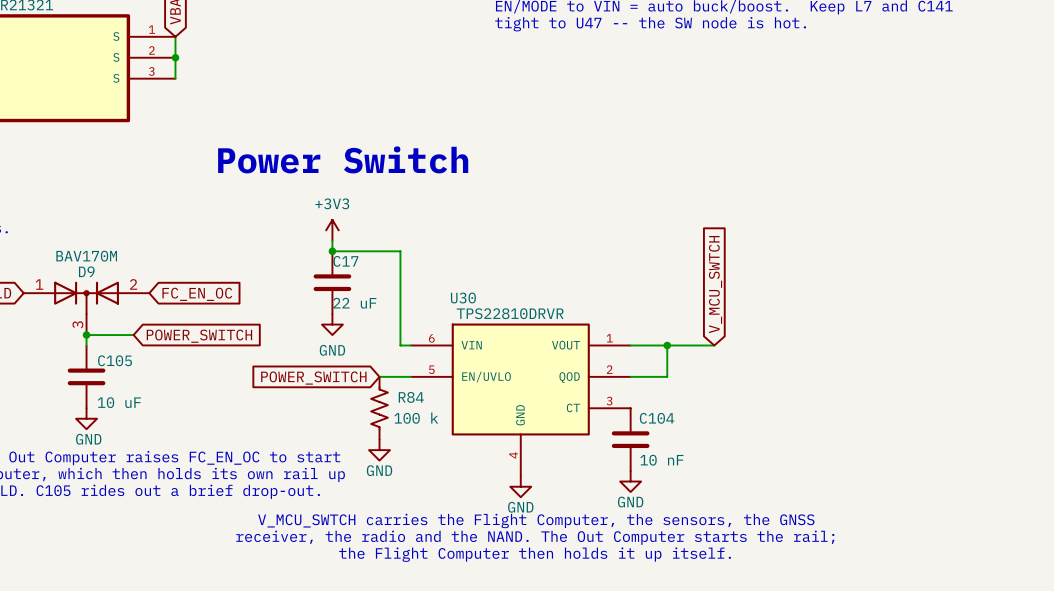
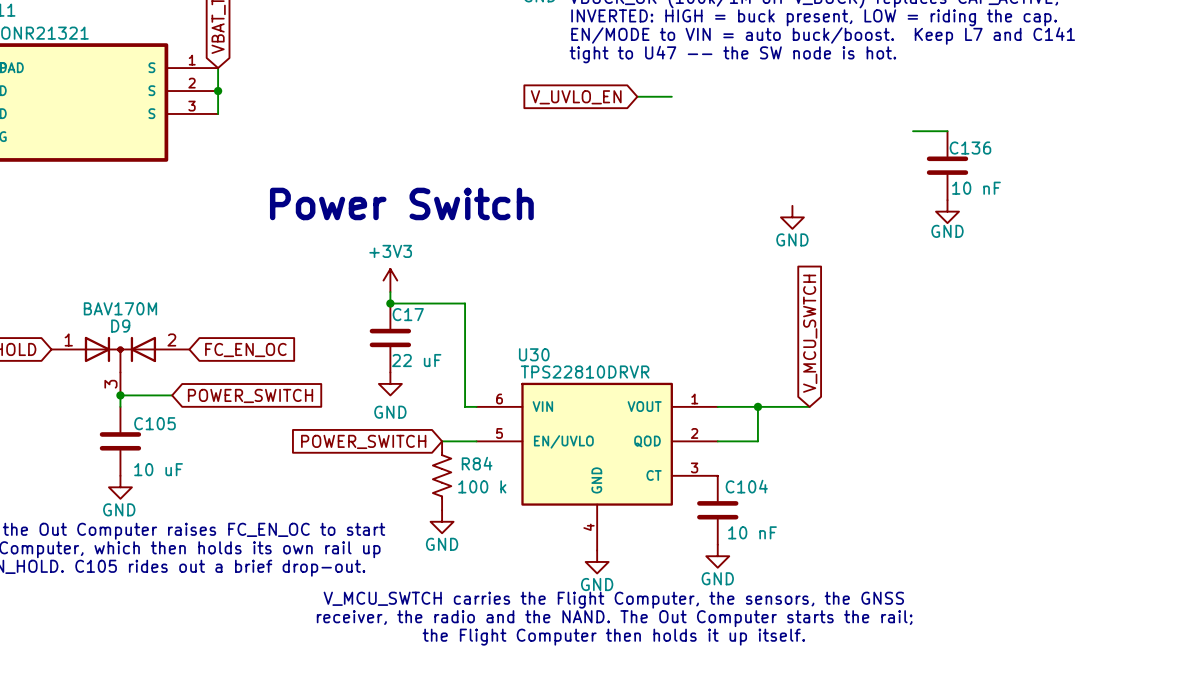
wire: none -> (637, 96) (671, 96)
global label: none -> V_UVLO_EN (576, 97)
wire: none -> (913, 131) (947, 131)
C136: none -> 10 nF (947, 165)
power symbol: none -> GND (947, 211)
power symbol: none -> GND (792, 217)

